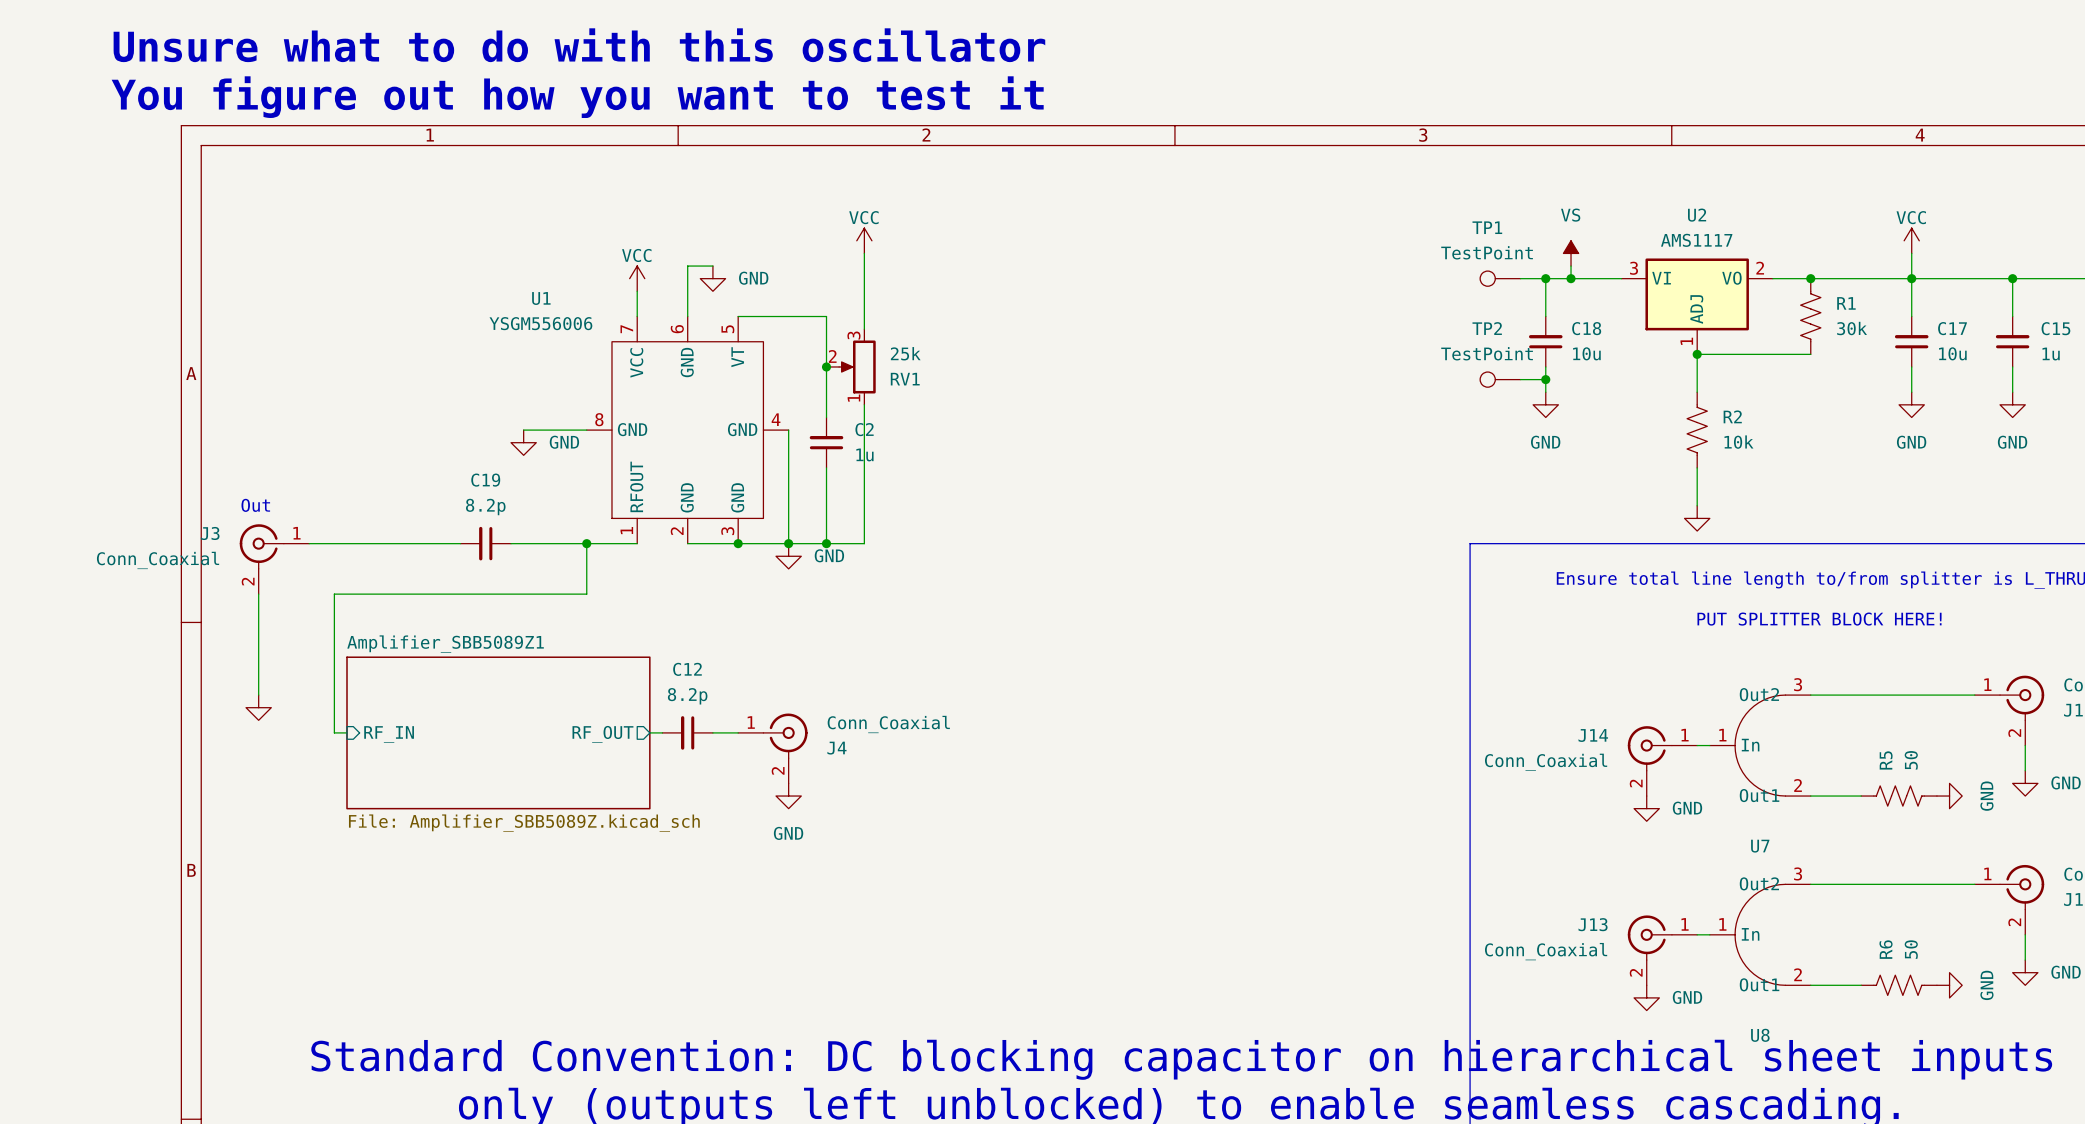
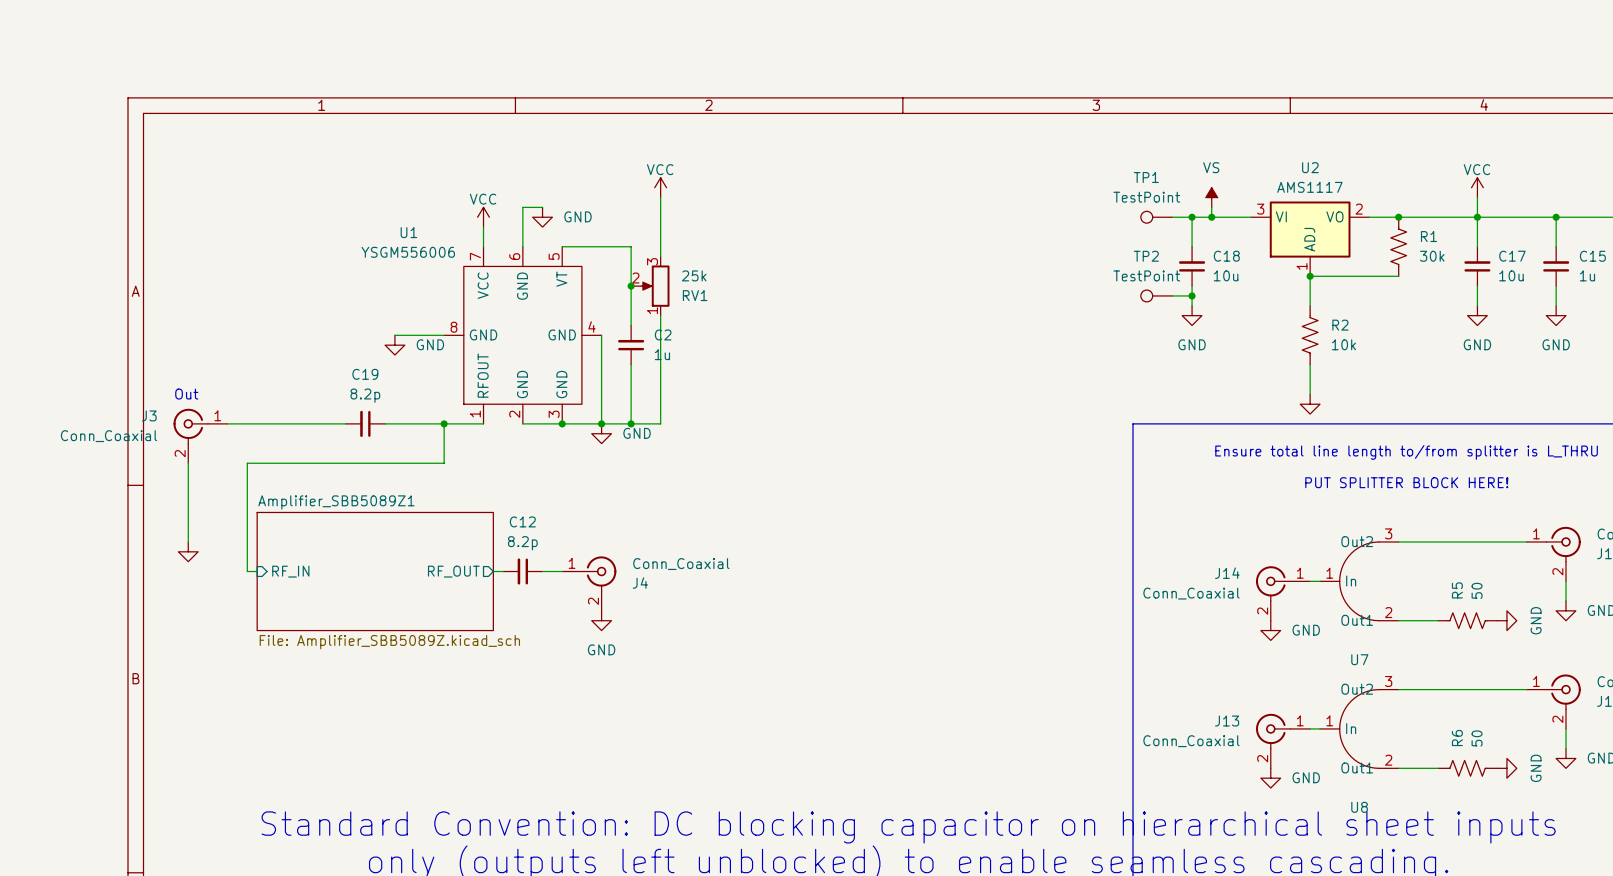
text: Unsure what to do with this oscillator (579, 45) -> none
text: You figure out how you want to test it (577, 97) -> none

